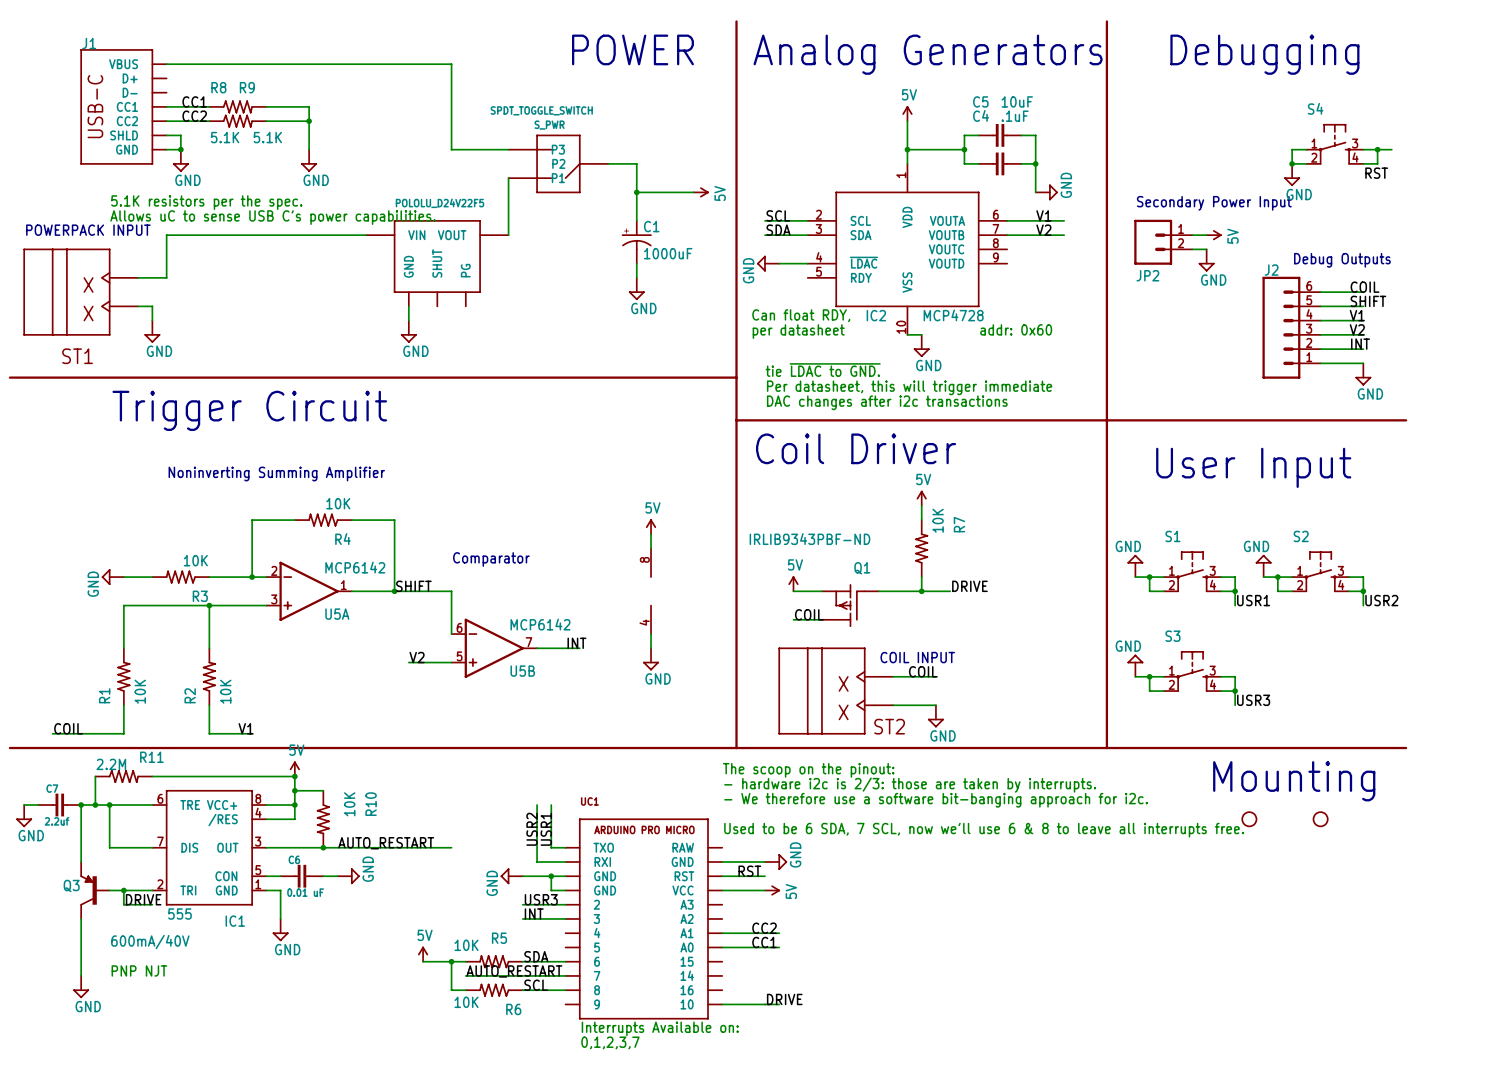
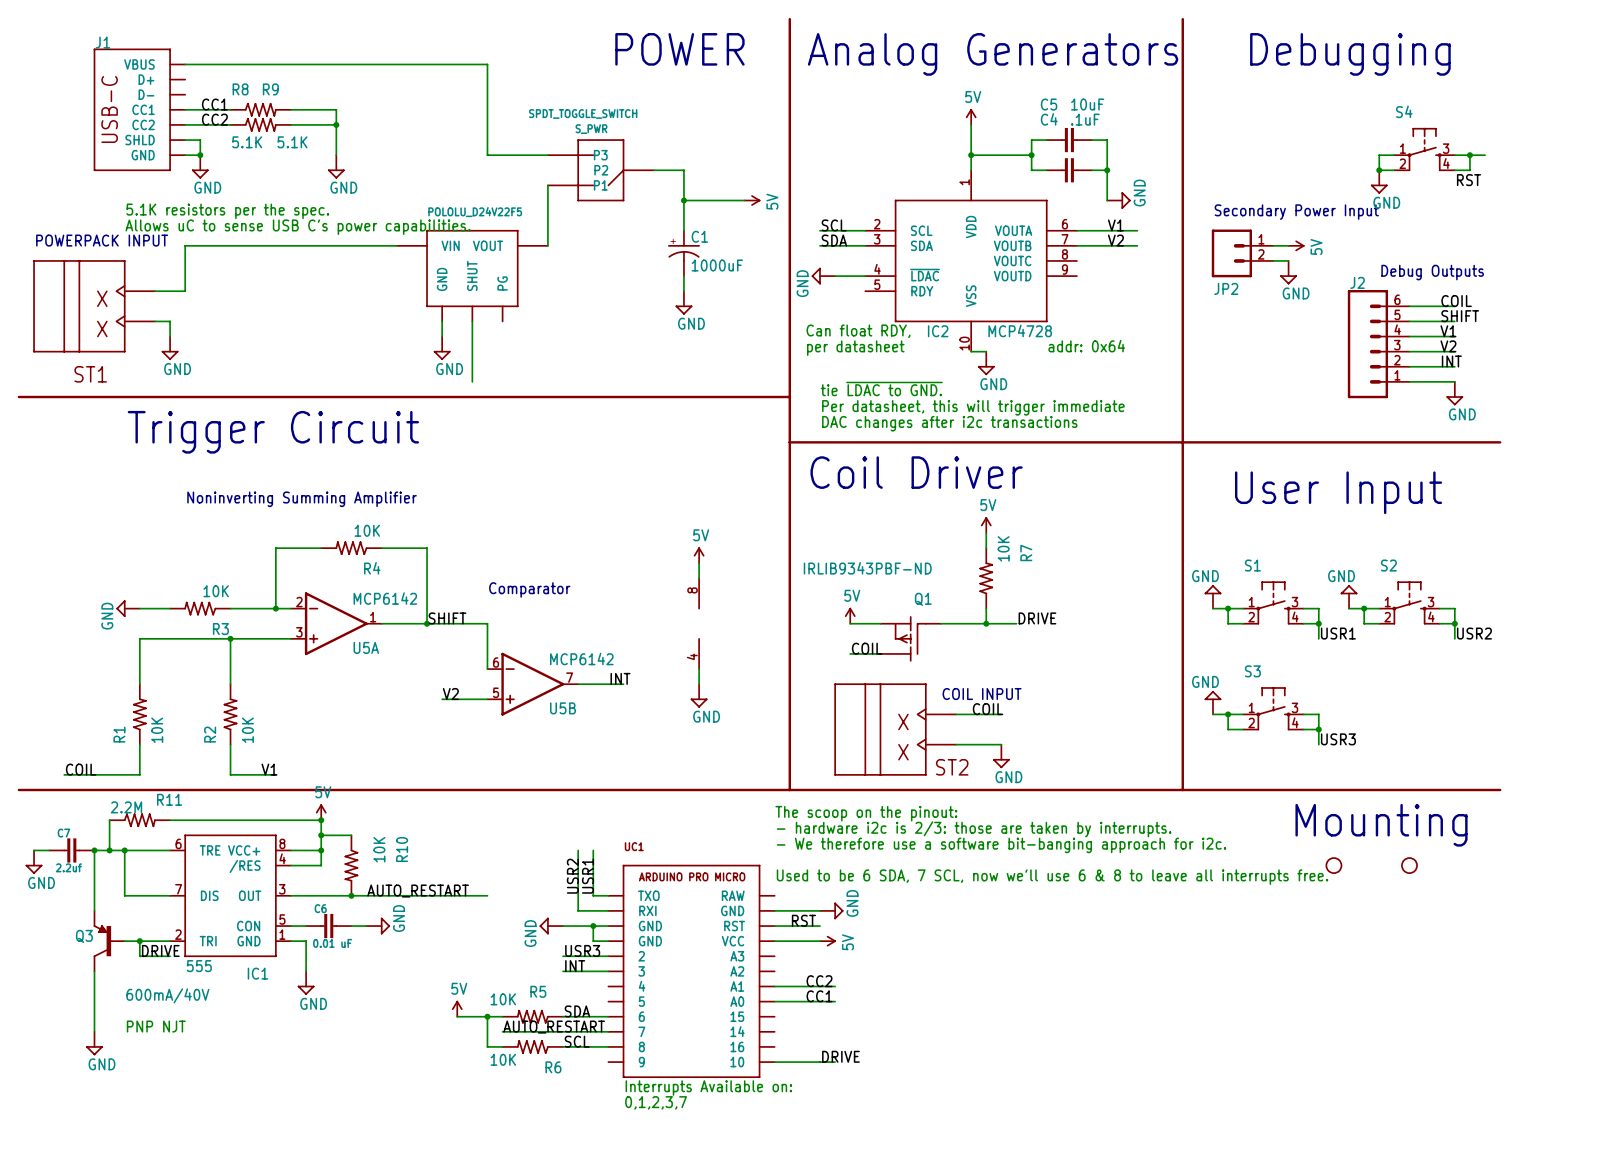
wire: none -> (472, 321) (472, 381)
text: addr: 0x60 (1016, 329) -> addr: 0x64 (1086, 346)

